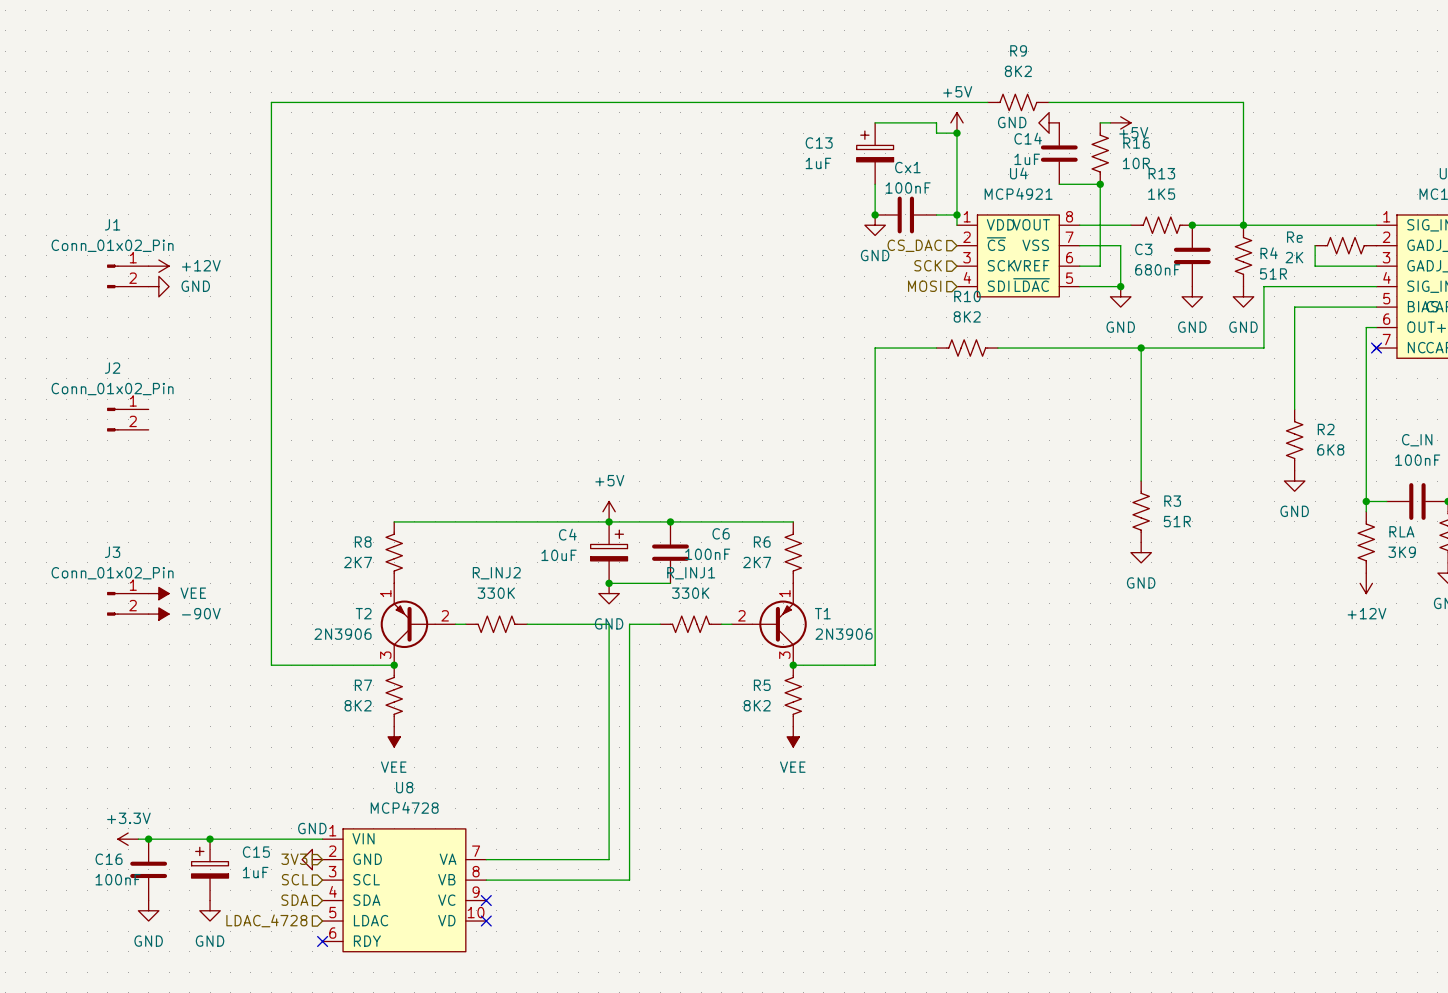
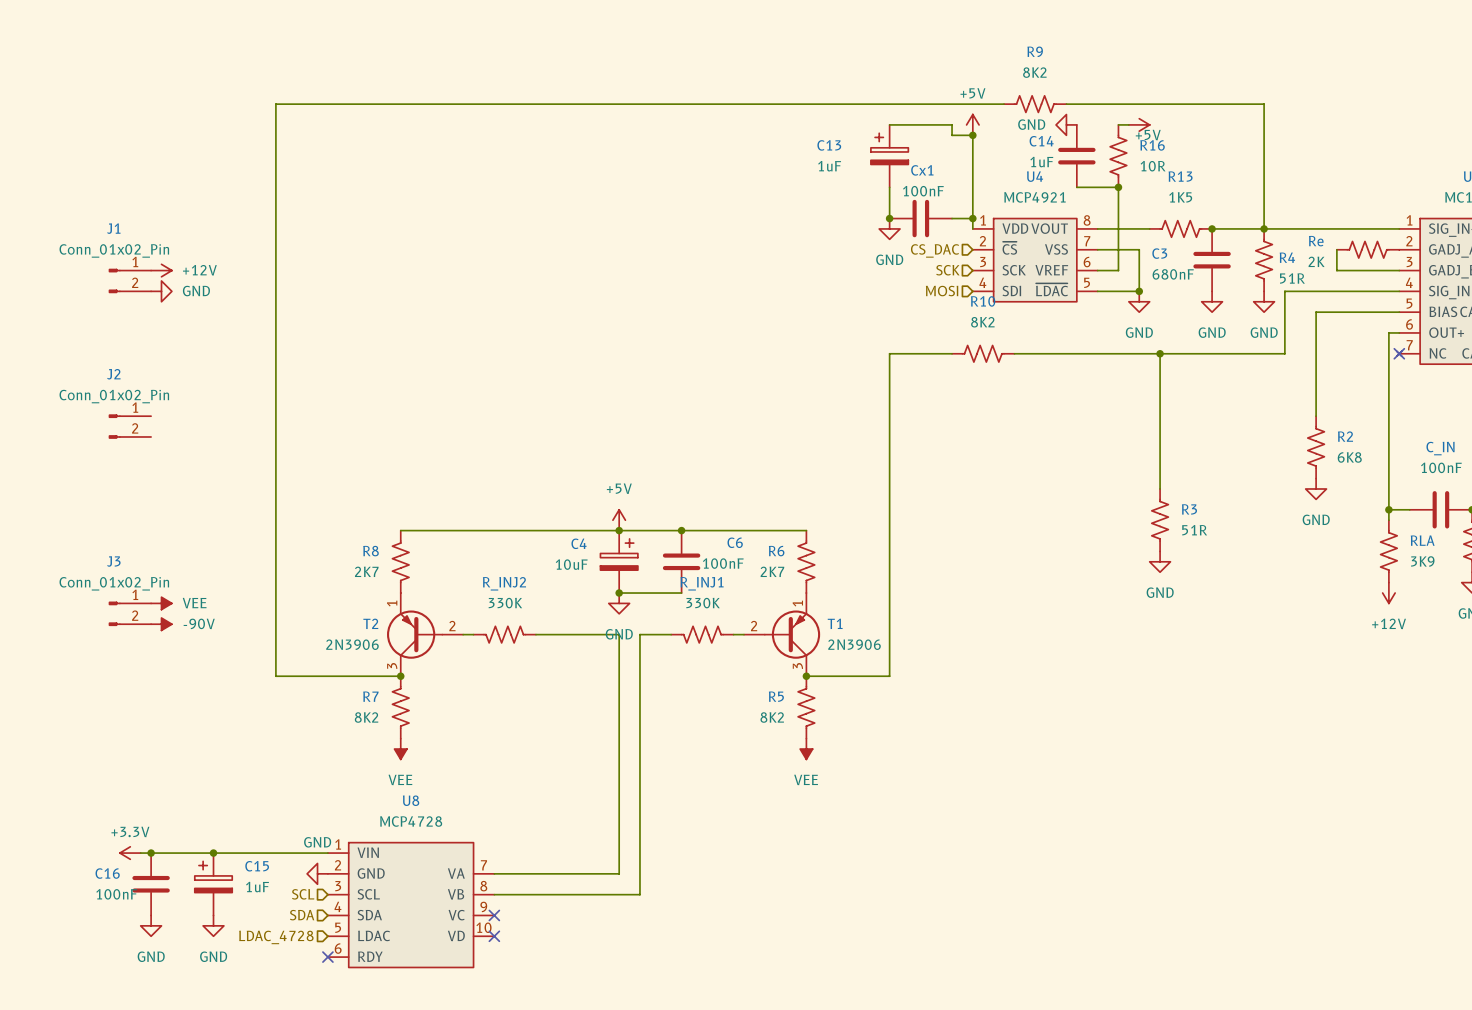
hierarchical label: 3V3 (294, 859) -> none

